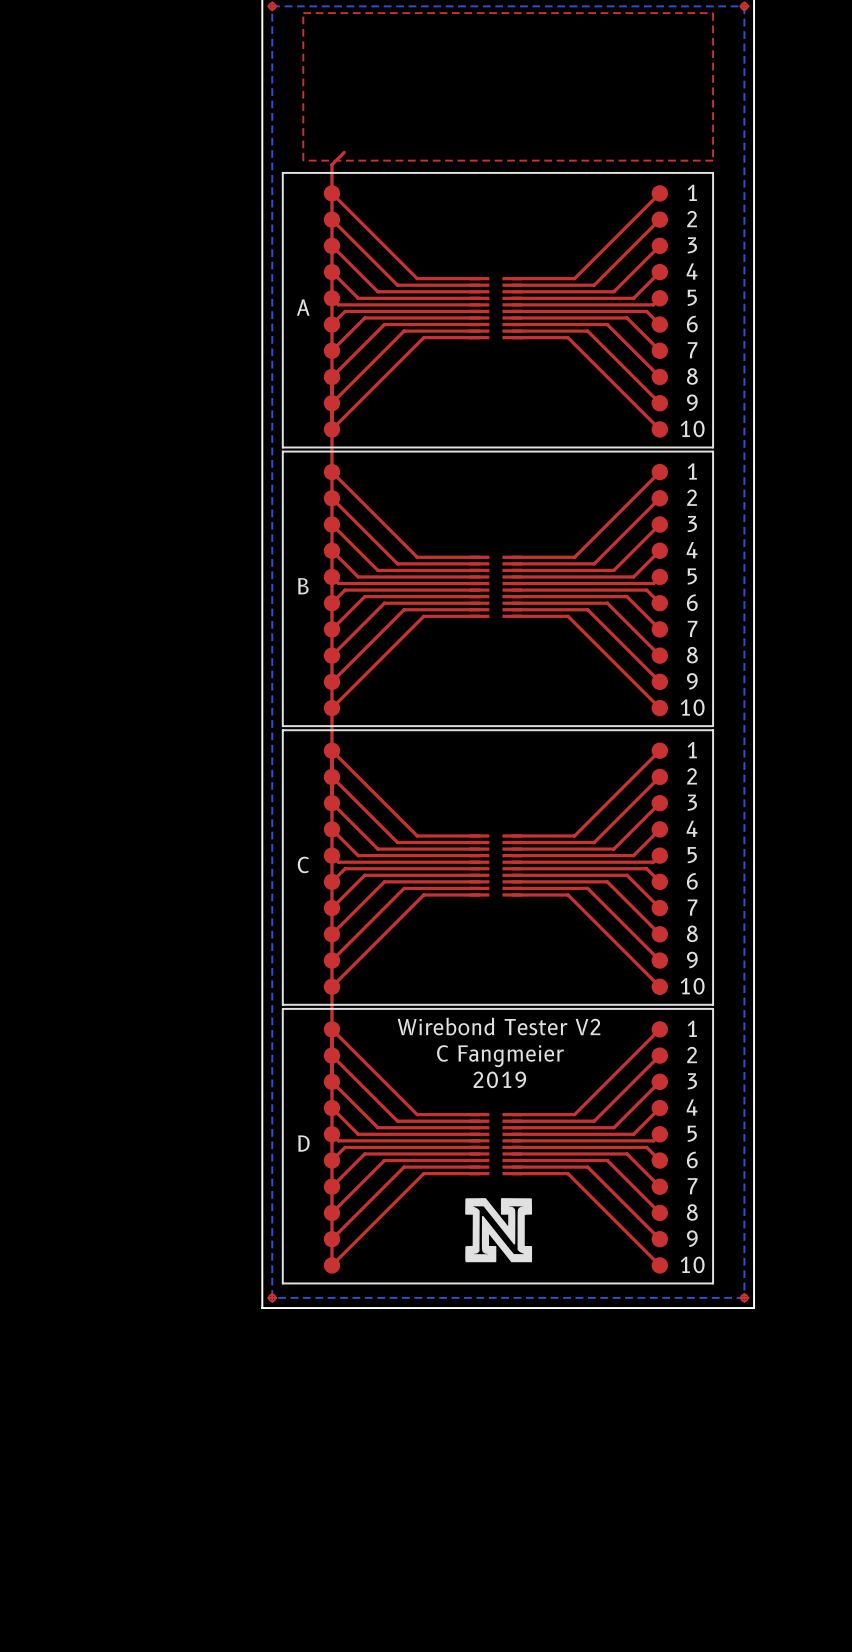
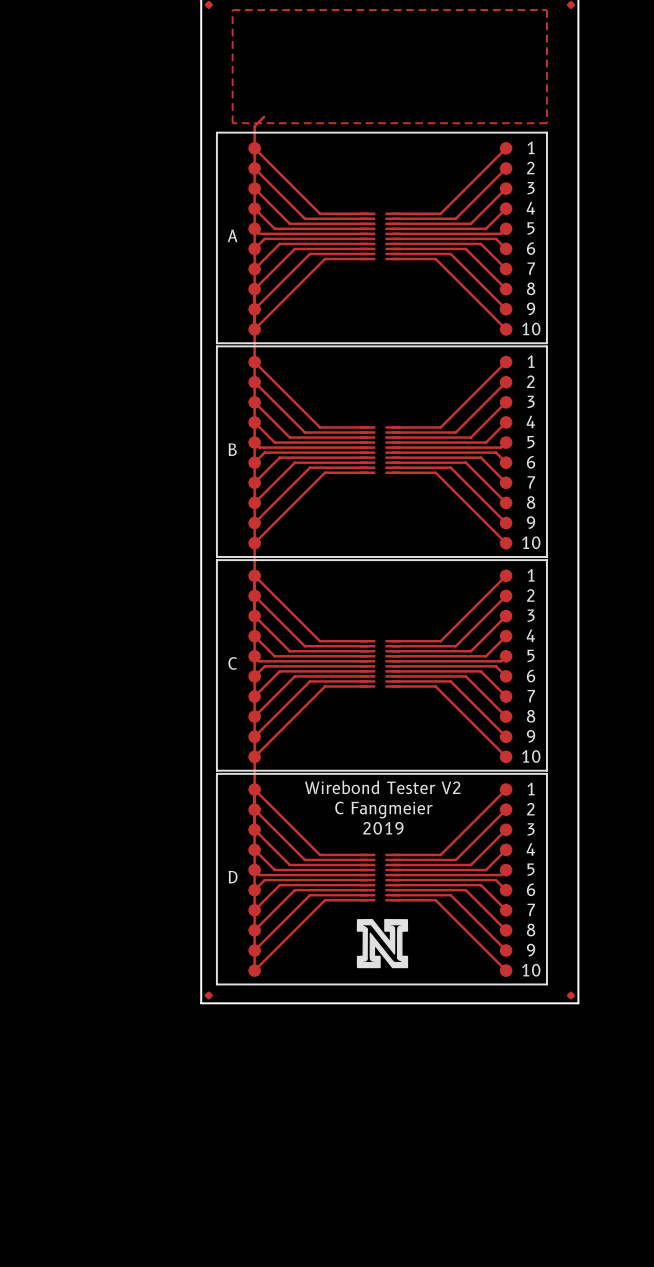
bottom zone outline: (272, 6) (272, 1297) (744, 1297) (744, 6) (272, 6) -> none

